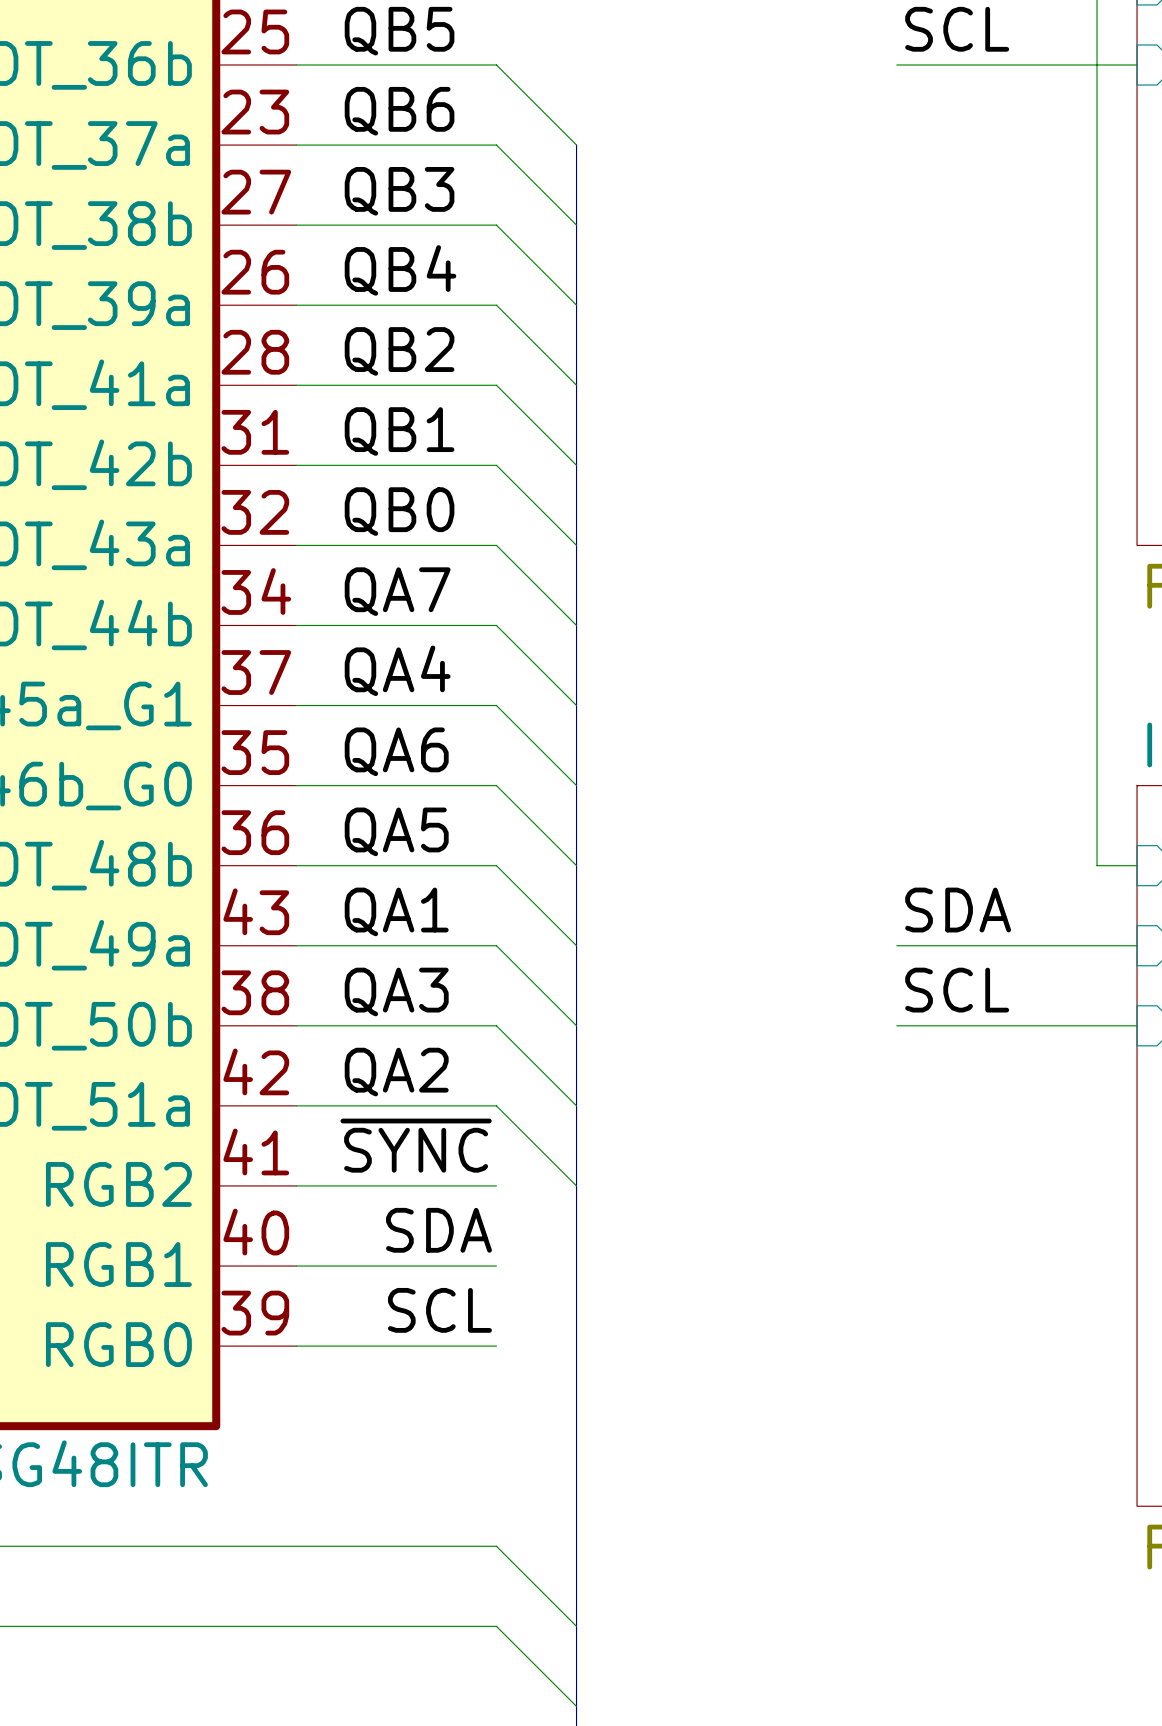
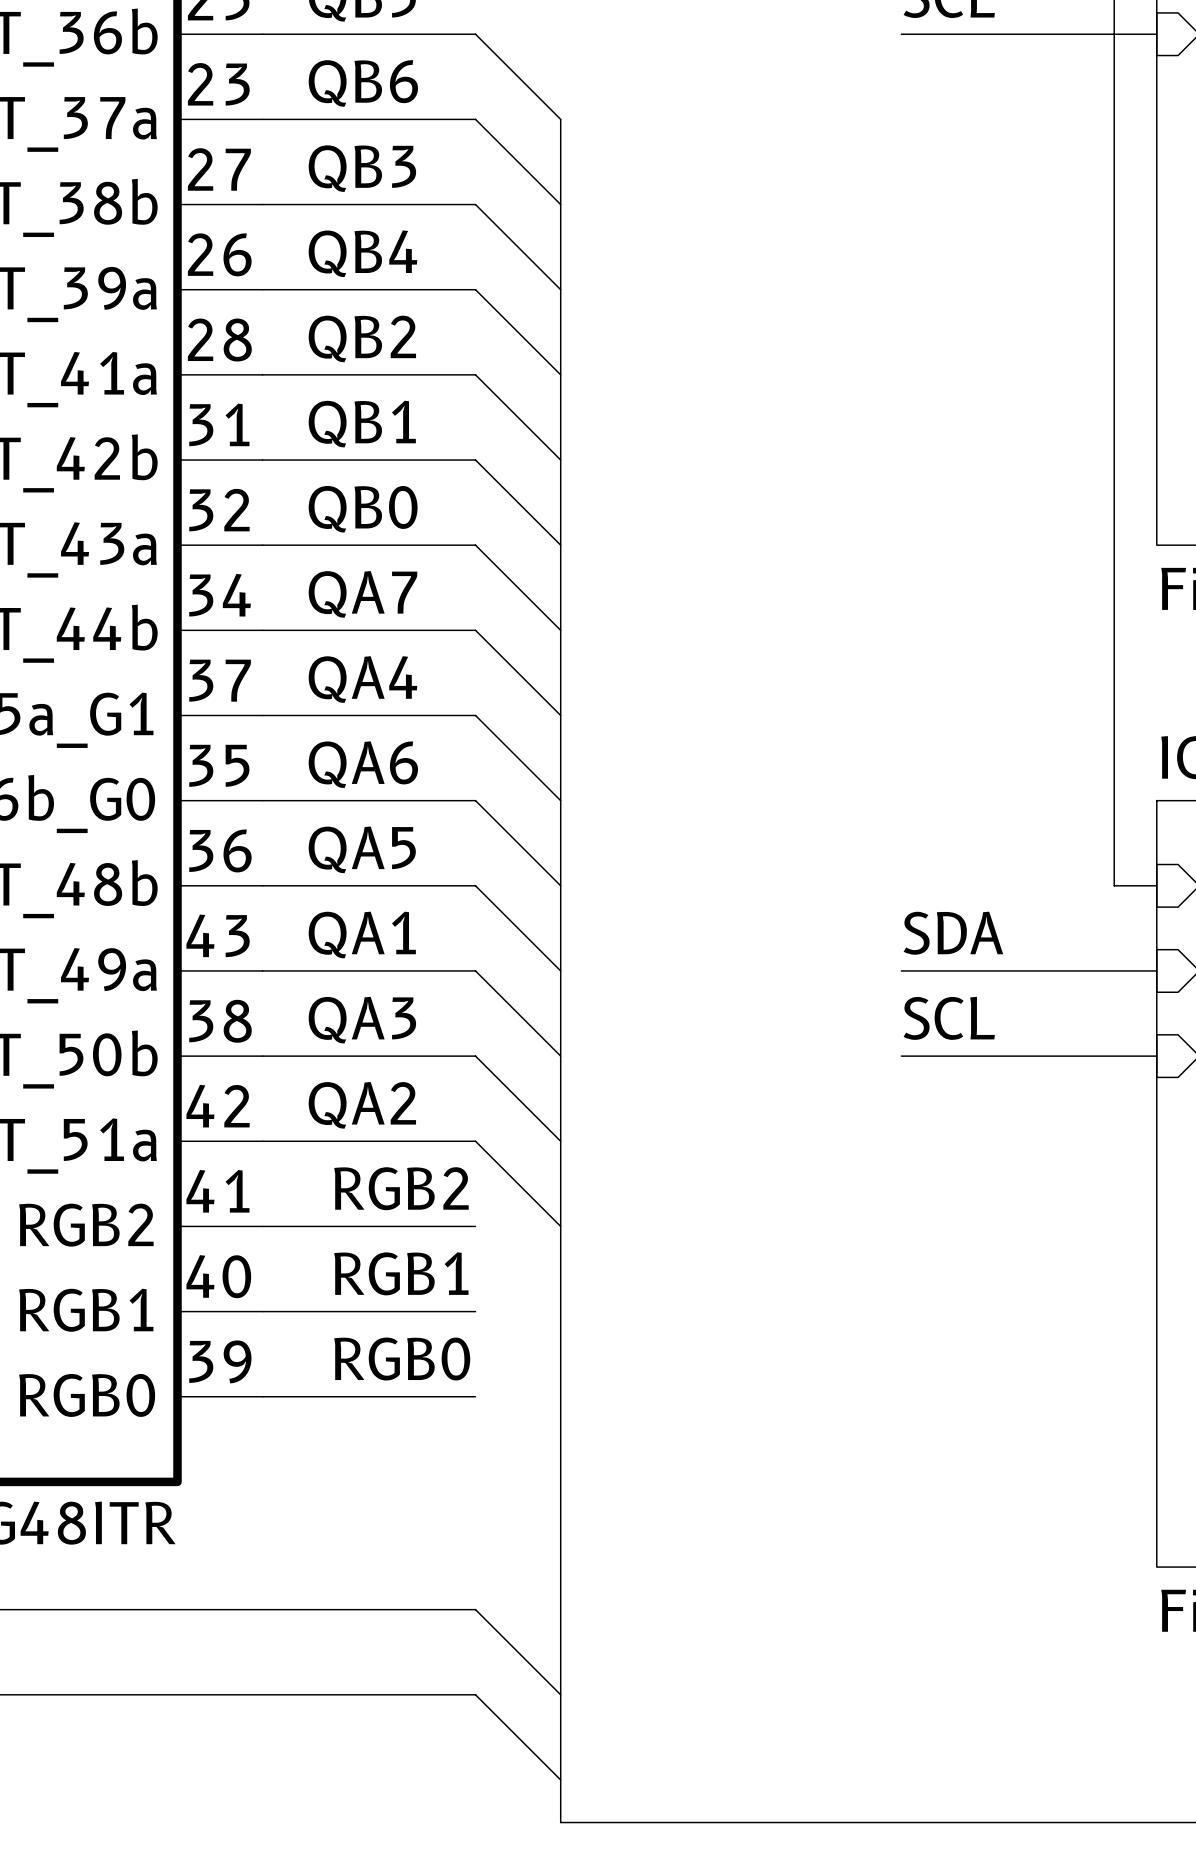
label: ~{SYNC} (416, 1145) -> RGB2 (401, 1188)
label: SDA (438, 1230) -> RGB1 (401, 1273)
label: SCL (439, 1310) -> RGB0 (402, 1359)

